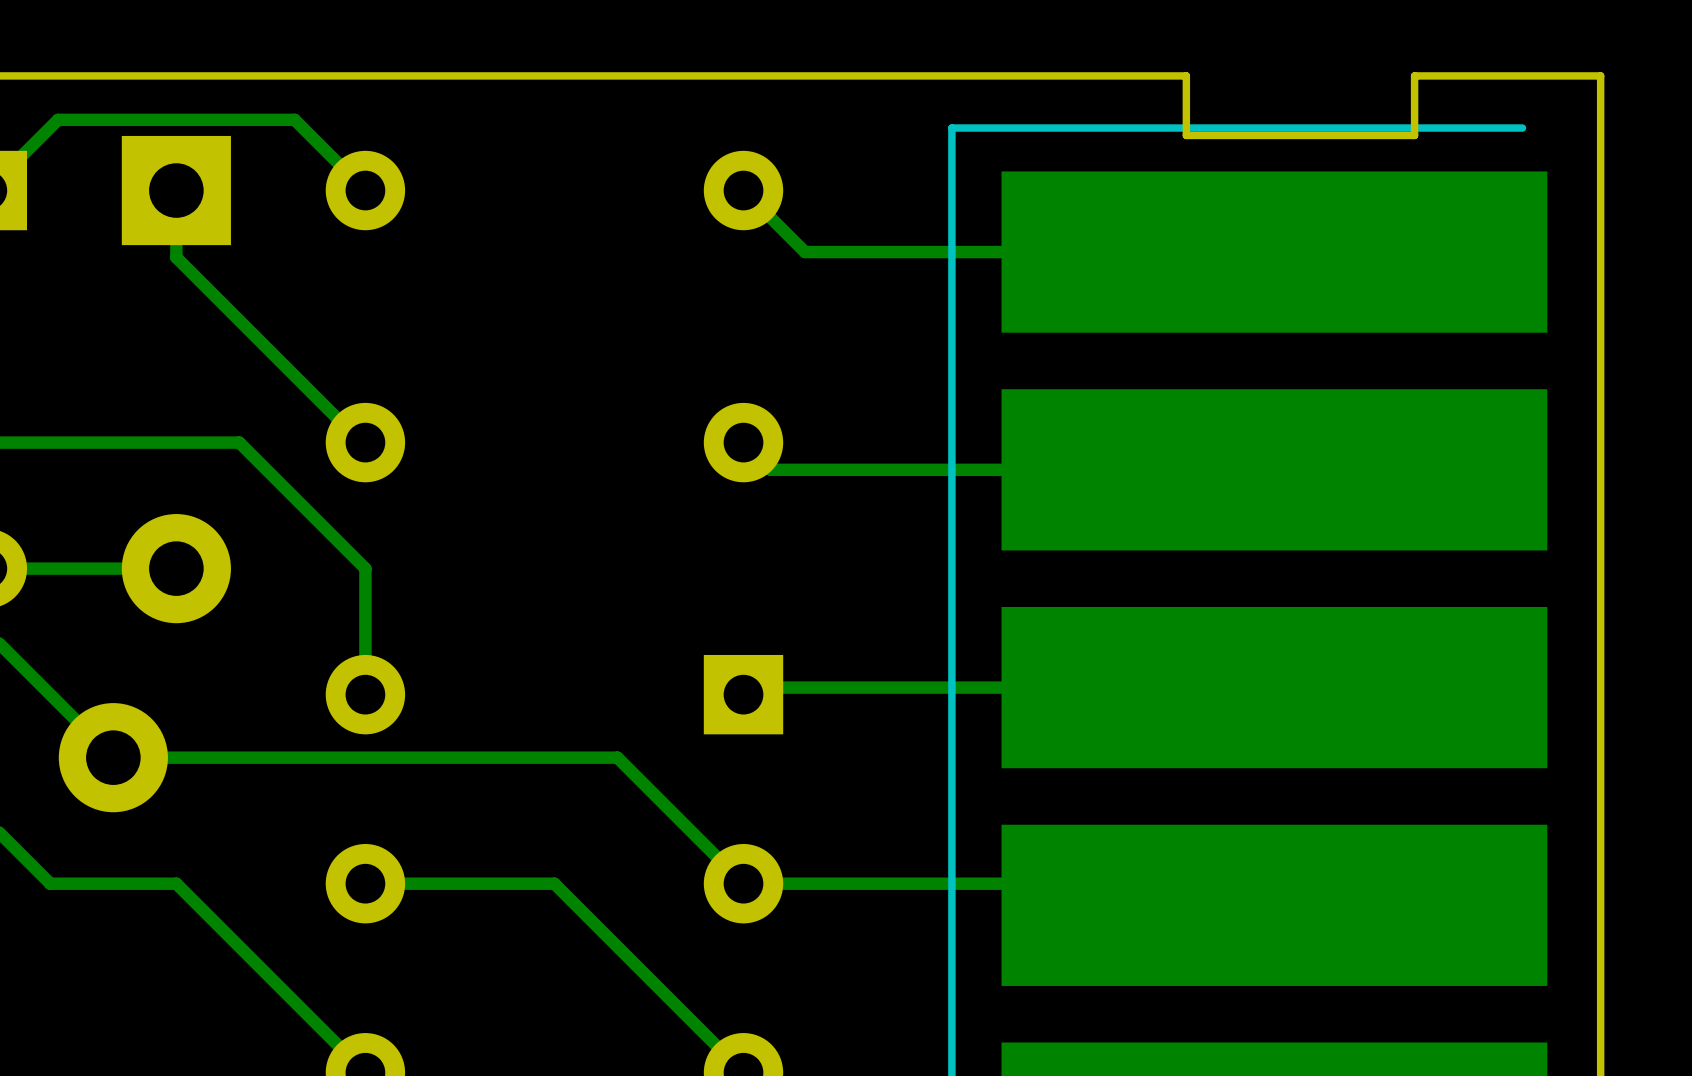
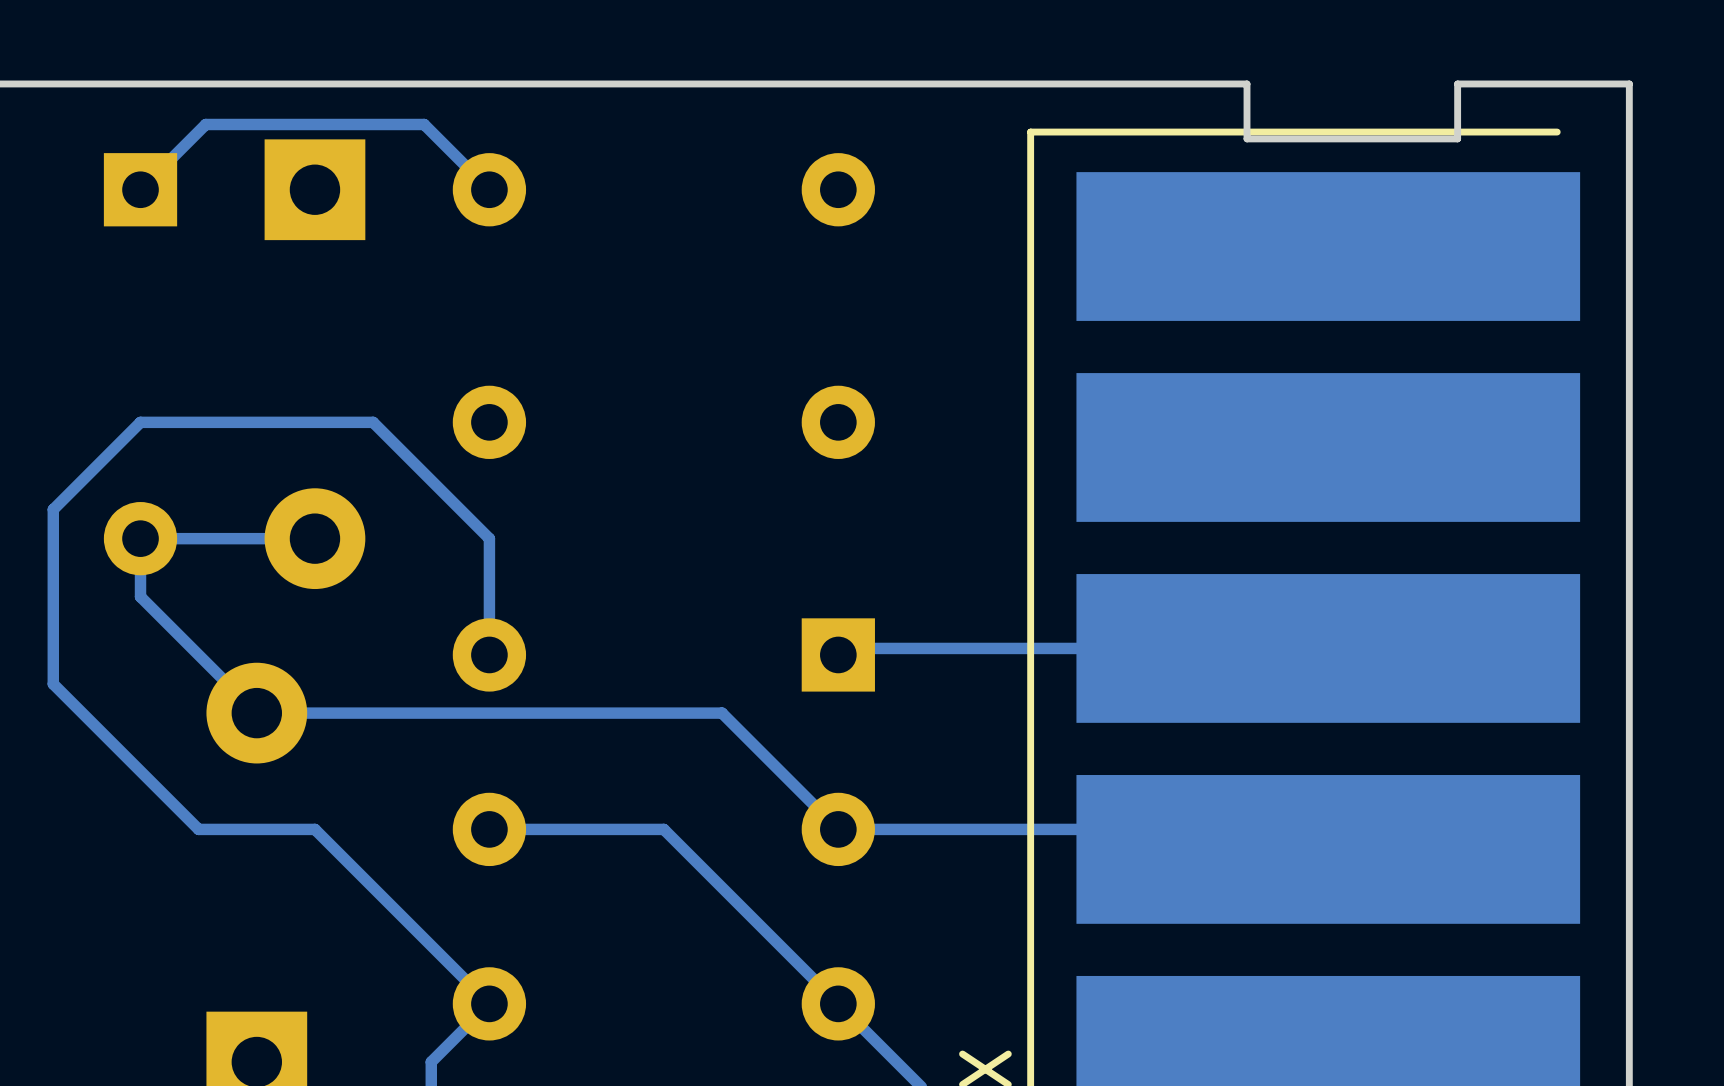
bottom track: (176, 190) (176, 257) (361, 442) (365, 442) -> none
bottom track: (743, 190) (805, 252) (1274, 252) -> none
bottom track: (743, 442) (770, 469) (1274, 469) -> none

